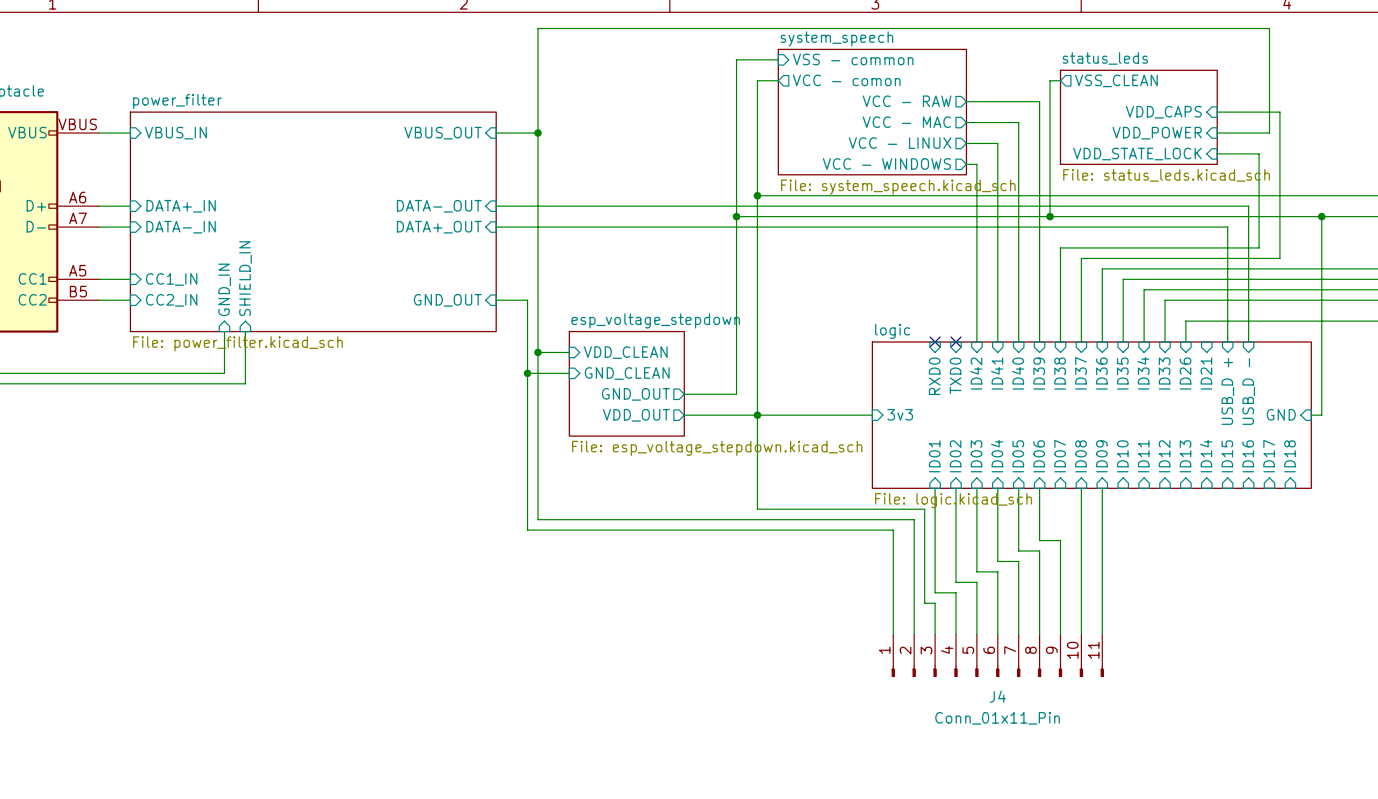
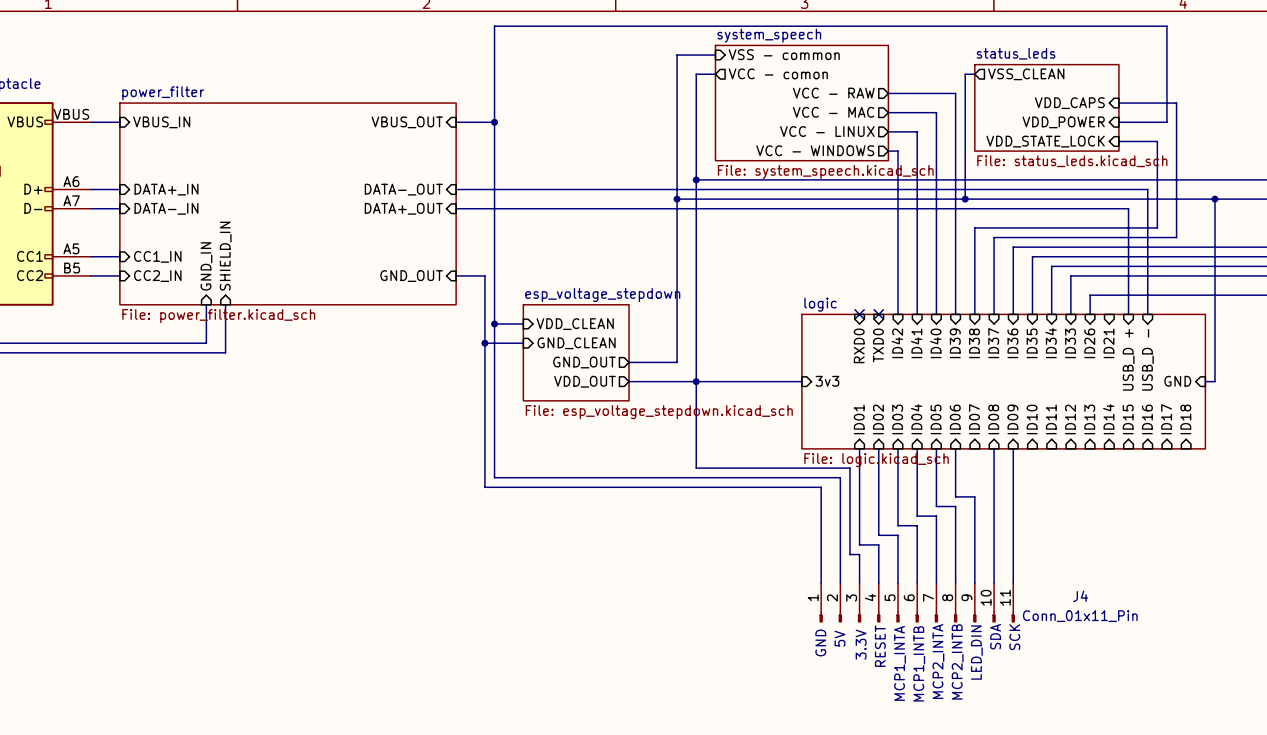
text: none -> SDA (995, 636)
text: none -> SCK (1014, 637)
text: none -> 5V (839, 638)
J4 name position: J4 (997, 696) -> J4 (1080, 596)
text: none -> GND (820, 642)
text: none -> 3.3V (861, 644)
text: none -> RESET (880, 646)
text: none -> LED_DIN (976, 652)
J4 value position: Conn_01x11_Pin (997, 718) -> Conn_01x11_Pin (1080, 616)
text: none -> MCP2_INTA (938, 661)
text: none -> MCP2_INTB (957, 661)
text: none -> MCP1_INTA (900, 663)
text: none -> MCP1_INTB (919, 663)

